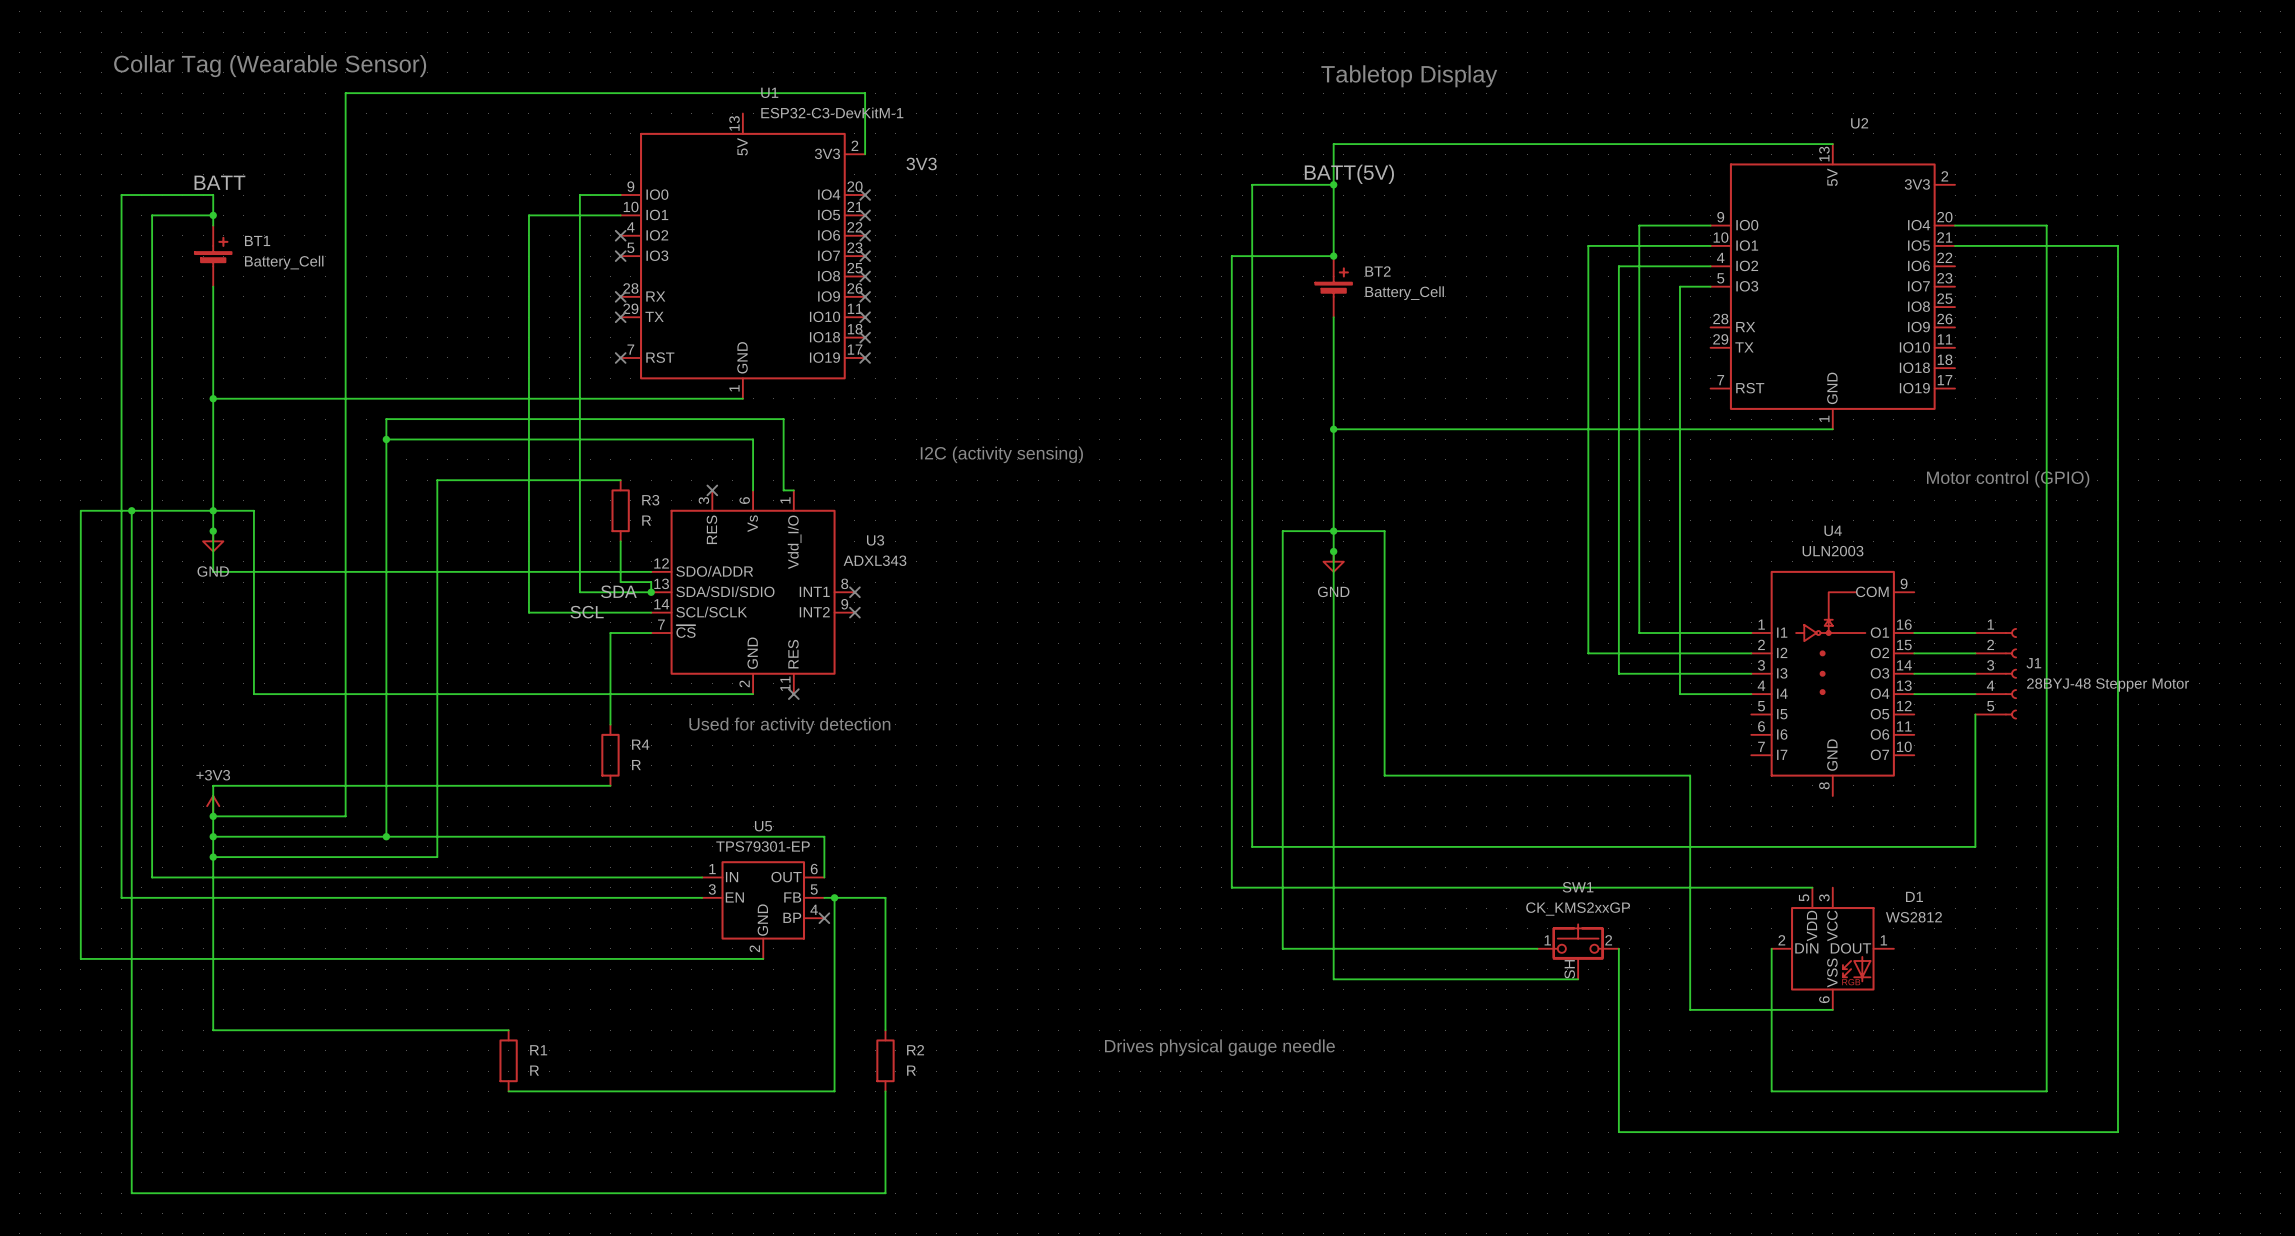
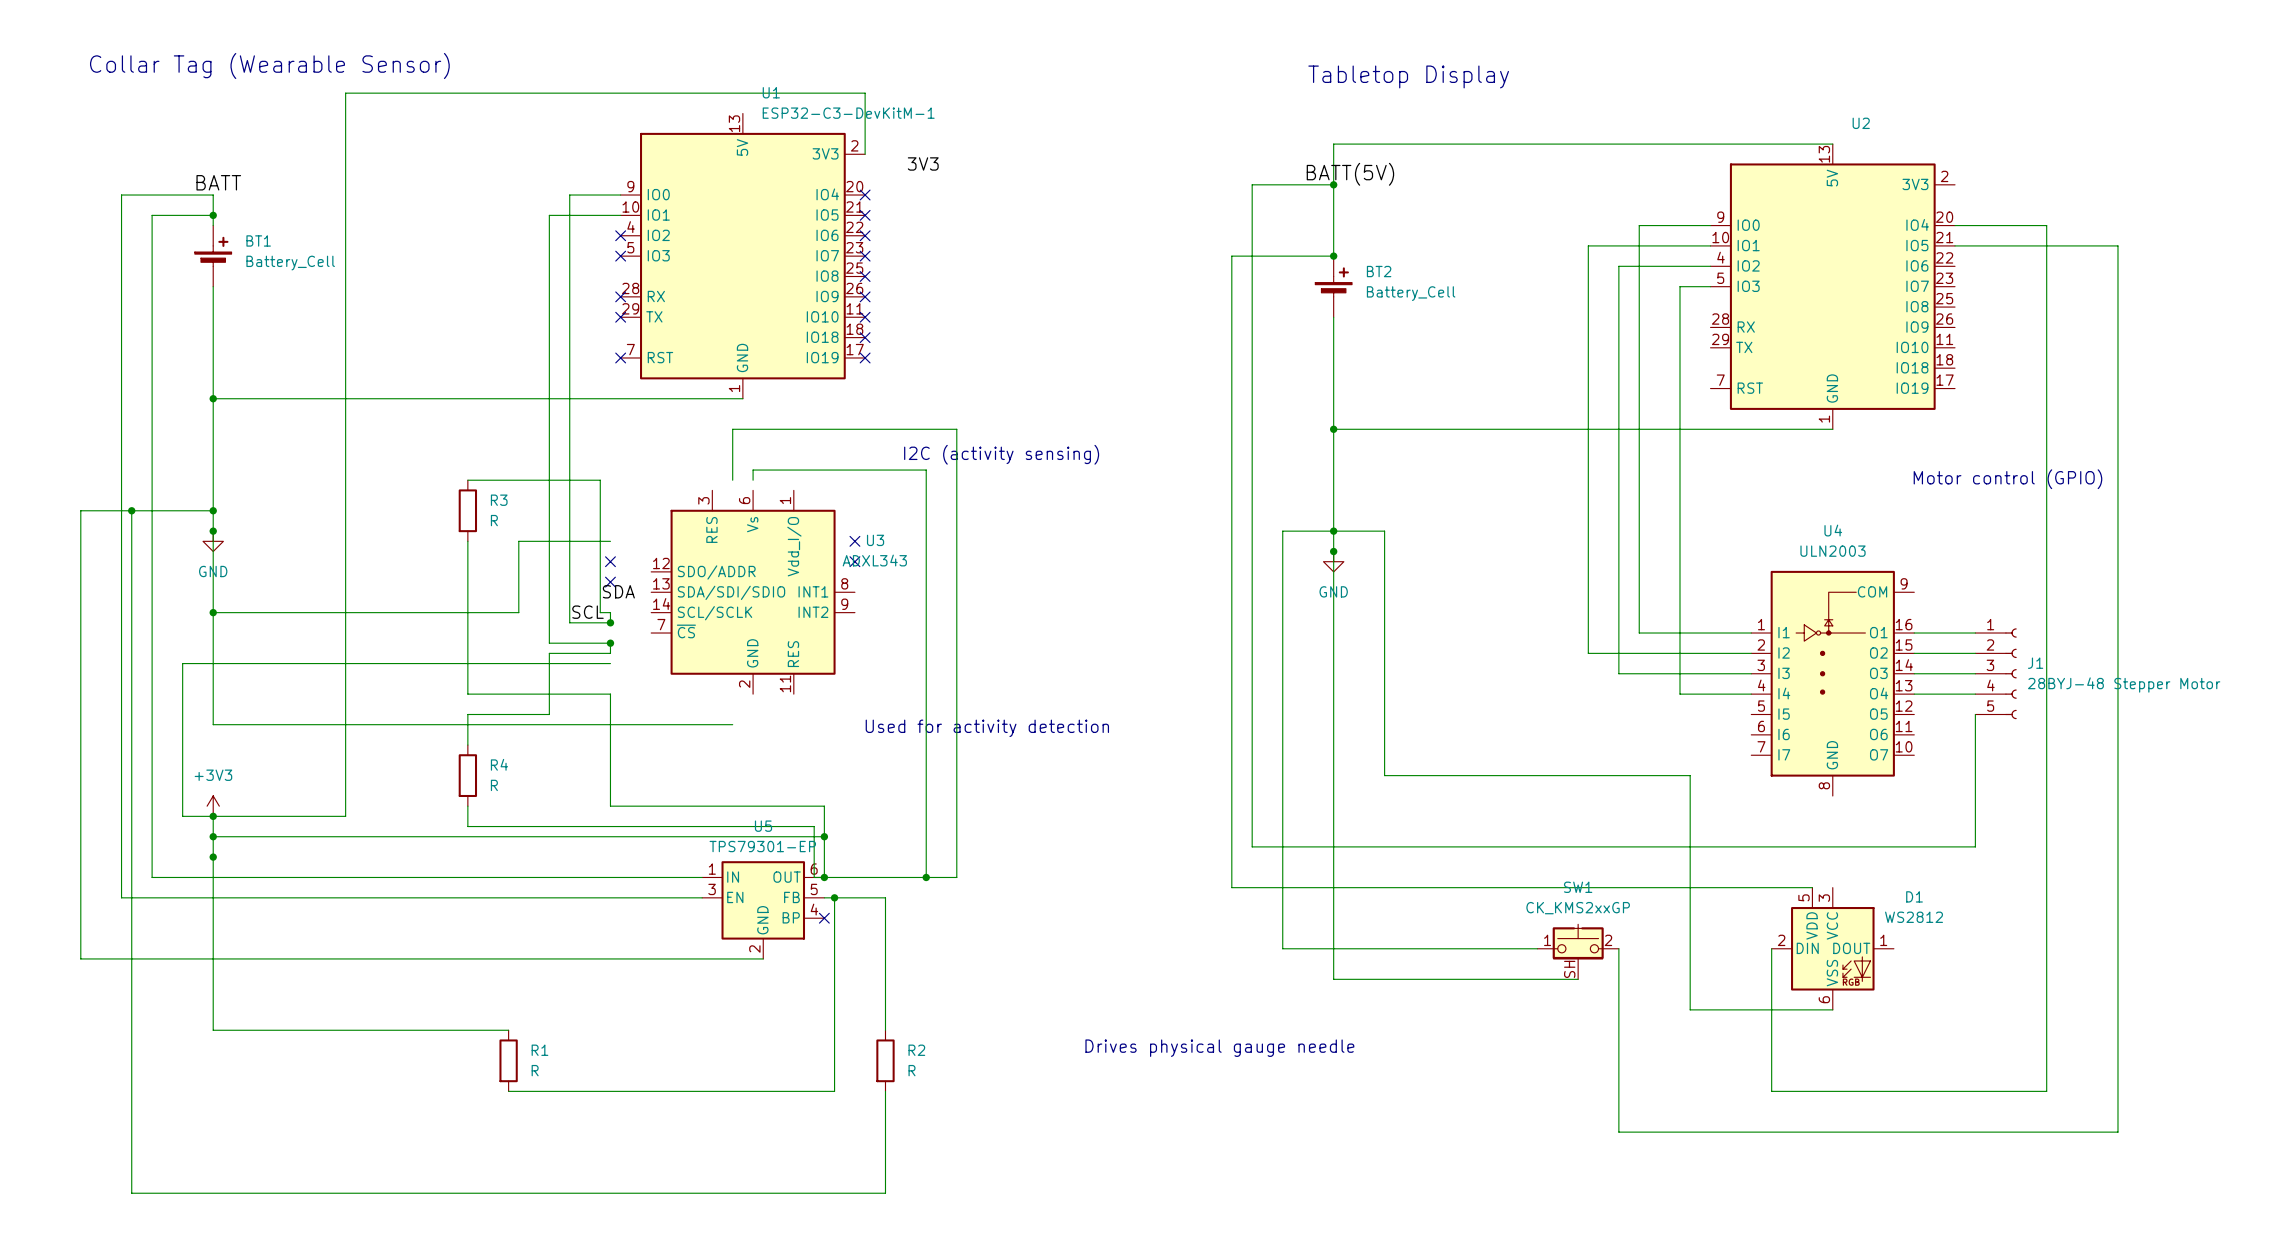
wire: (579, 195) (579, 592) (651, 592) (651, 582) (620, 582) (620, 541) -> (579, 195) (569, 195) (569, 622) (610, 622) (610, 612)
wire: (549, 215) (528, 215) (528, 612) (600, 612) -> (549, 215) (549, 643) (610, 643)
wire: (386, 439) (753, 439) (753, 470) -> (926, 877) (926, 470) (753, 470)
junction: (386, 439) -> none
wire: (467, 480) (437, 480) (437, 857) (213, 857) -> none
wire: (600, 480) (620, 480) -> (600, 480) (600, 612)
wire: none -> (732, 480) (732, 429) (956, 429) (956, 877) (814, 877) (814, 826) (467, 826) (467, 806)
wire: (753, 480) (753, 490) -> none
no-connect mark: (712, 490) -> none
wire: (793, 490) (783, 490) (783, 419) (386, 419) (386, 836) -> none
wire: (213, 510) (253, 510) (253, 694) (467, 694) -> (467, 541) (467, 694)
R3 position: (620, 510) -> (467, 510)
wire: none -> (610, 541) (518, 541) (518, 612) (213, 612)
no-connect mark: none -> (854, 541)
no-connect mark: none -> (610, 561)
no-connect mark: none -> (854, 561)
wire: (213, 571) (651, 571) -> (213, 571) (213, 724) (732, 724)
no-connect mark: none -> (610, 582)
junction: (651, 592) -> none
no-connect mark: (854, 592) -> none
junction: none -> (213, 612)
wire: (610, 612) (651, 612) -> none
no-connect mark: (854, 612) -> none
junction: none -> (610, 622)
wire: (651, 633) (610, 633) (610, 643) -> none
junction: none -> (610, 643)
wire: (610, 653) (610, 694) (753, 694) -> (610, 653) (549, 653) (549, 714) (467, 714) (467, 745)
no-connect mark: (793, 694) -> none
wire: none -> (610, 724) (610, 806) (824, 806) (824, 836)
text position: Used for activity detection (789, 725) -> Used for activity detection (987, 728)
R4 position: (610, 755) -> (467, 775)
wire: (610, 785) (213, 785) (213, 816) -> (610, 663) (182, 663) (182, 816) (213, 816)
junction: (386, 836) -> none
junction: none -> (824, 836)
junction: none -> (824, 877)
junction: none -> (926, 877)

